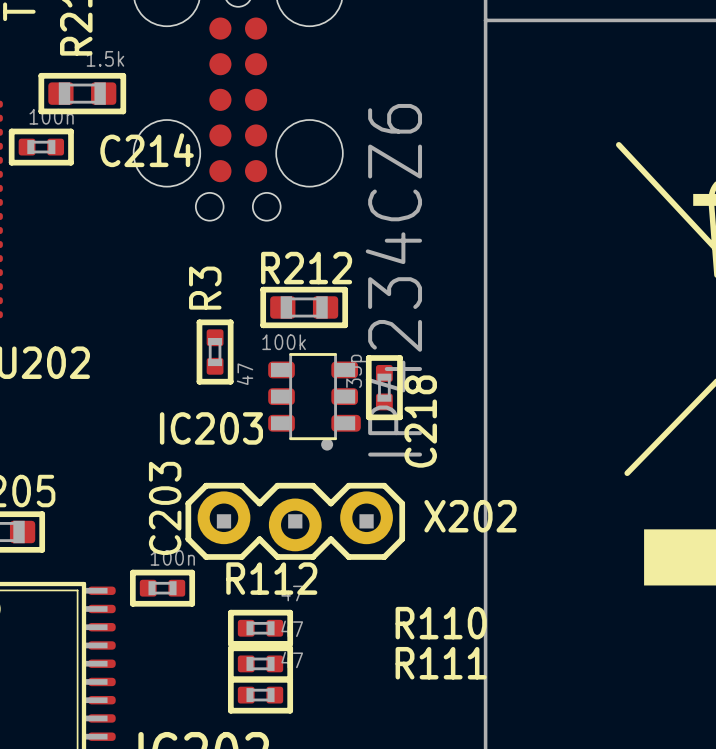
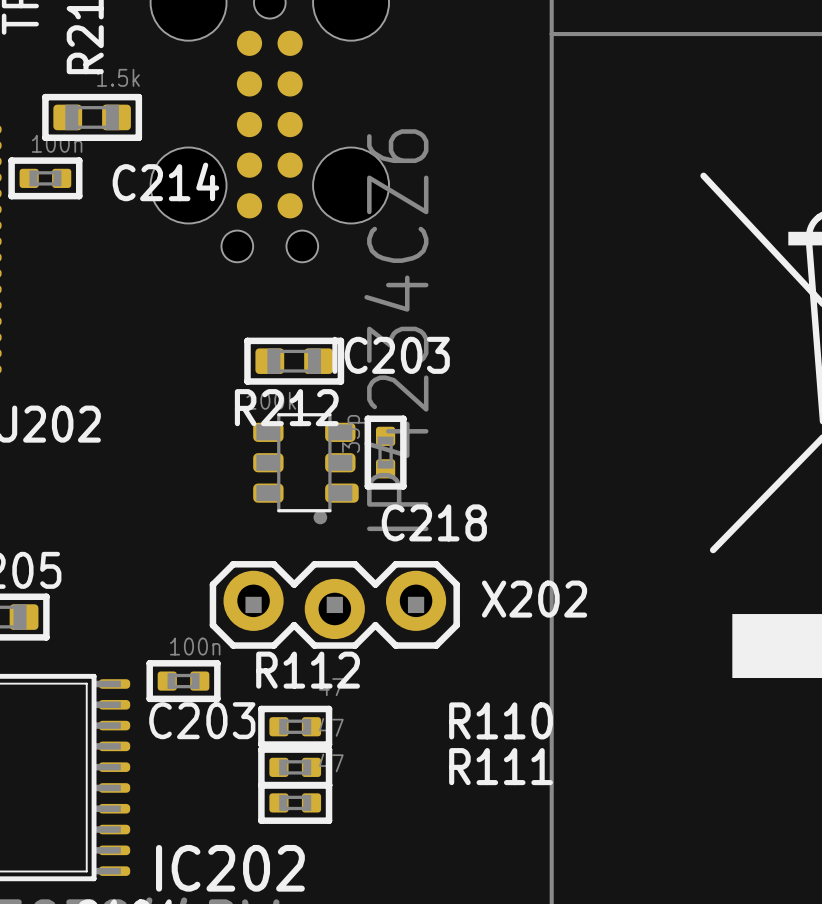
R212 name position: R212 (306, 268) -> R212 (286, 407)
R212 position: (304, 307) -> (294, 361)
R3: 47 (215, 352) -> none
C218 position: (384, 387) -> (385, 452)
IC203 position: (314, 401) -> (305, 468)
C218 name rotation: 0° (420, 421) -> 90° clockwise (434, 522)
IC203 name position: IC203 (211, 428) -> IC203 (391, 355)
C203 name rotation: 0° (165, 508) -> 90° clockwise (202, 720)
C203 name position: C203 (165, 508) -> C203 (202, 720)

